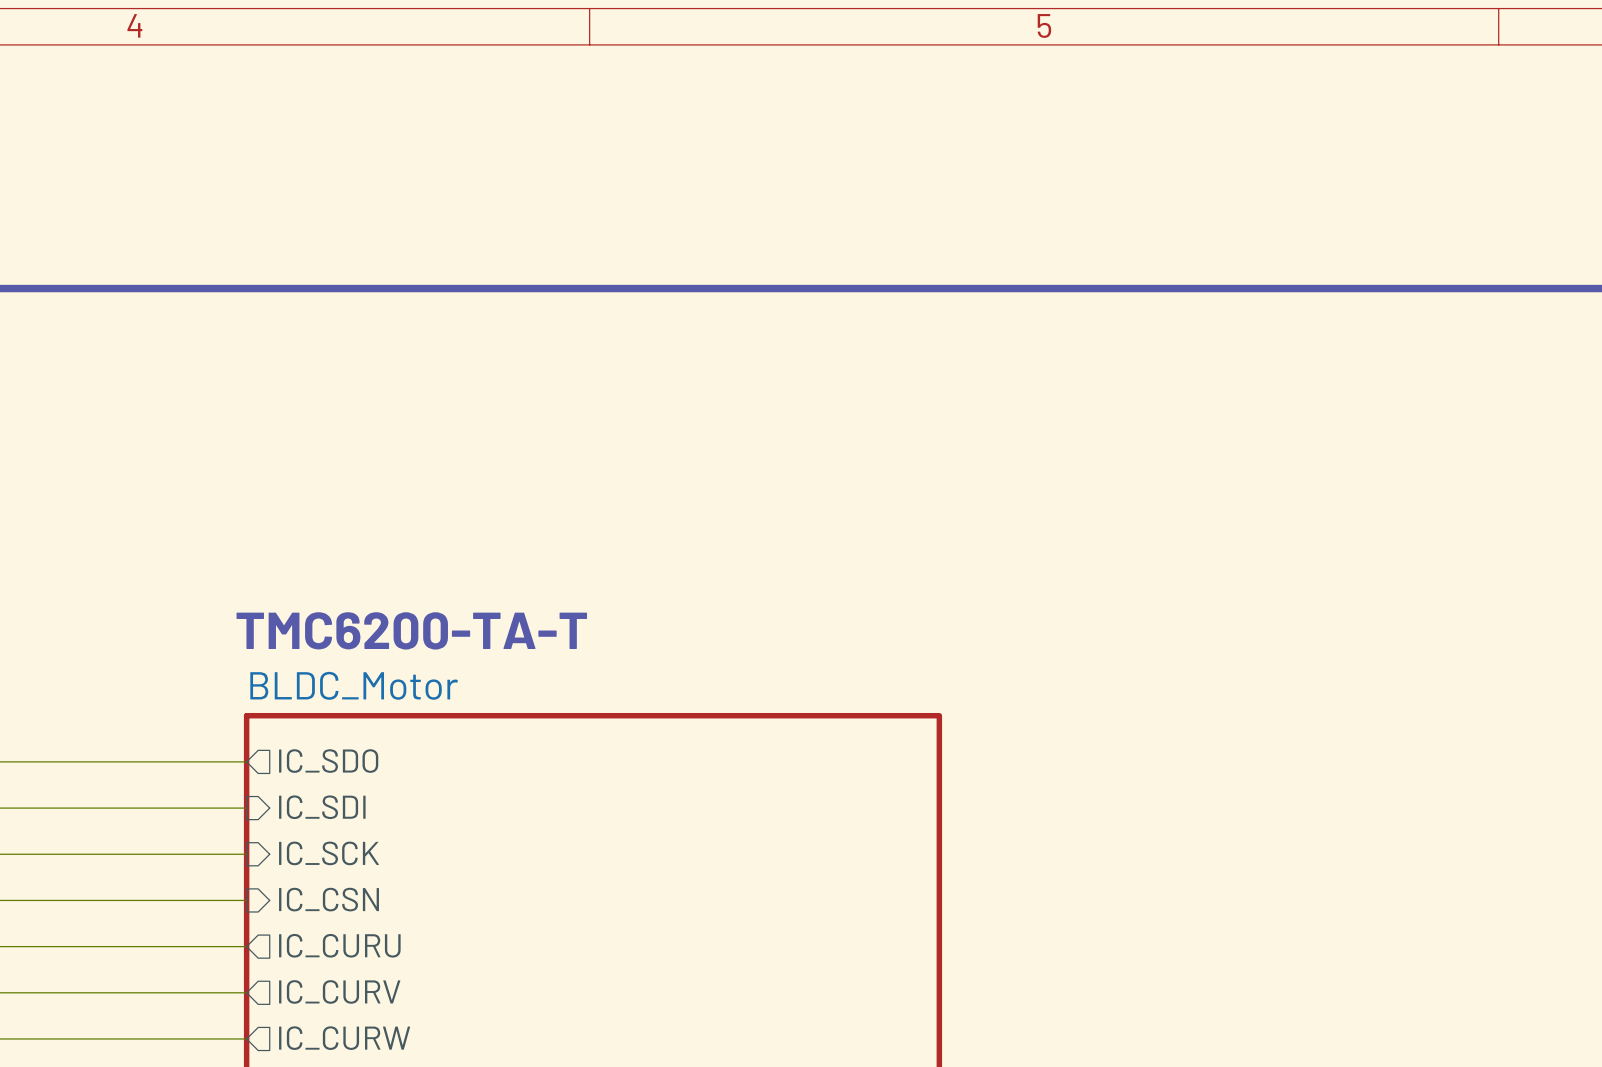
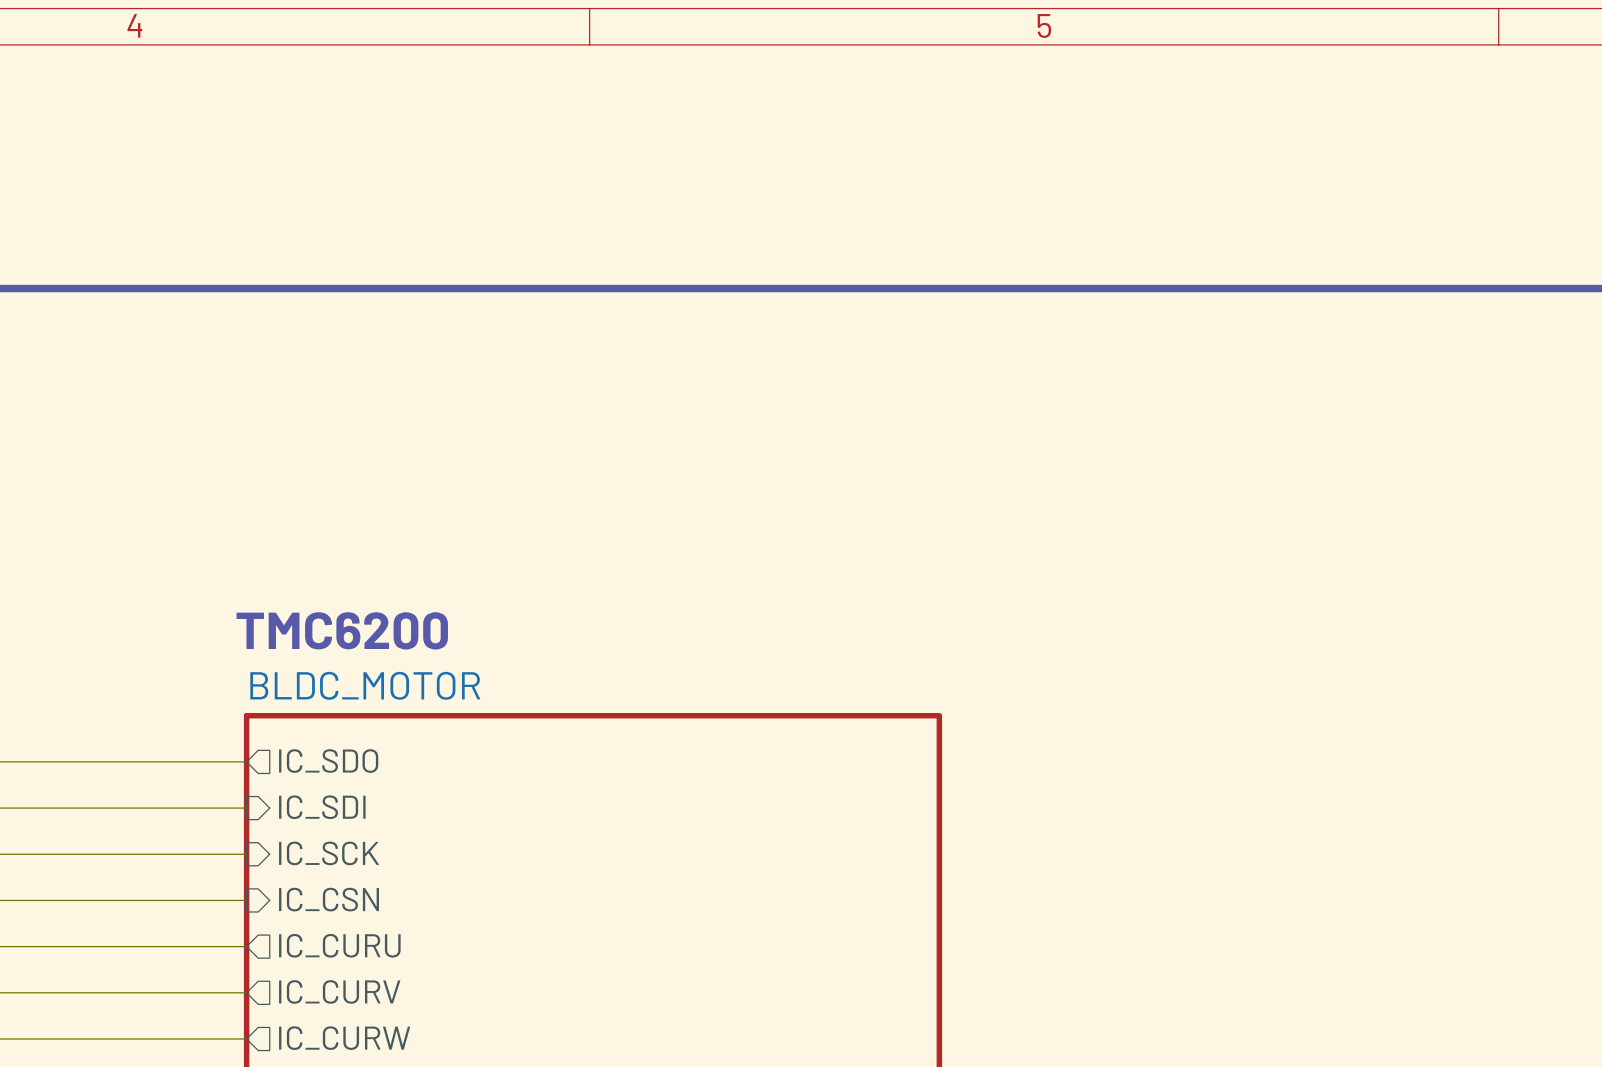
text: TMC6200-TA-T (411, 630) -> TMC6200 (342, 630)
sheet BLDC_Motor name: BLDC_Motor (354, 685) -> BLDC_MOTOR (365, 685)

